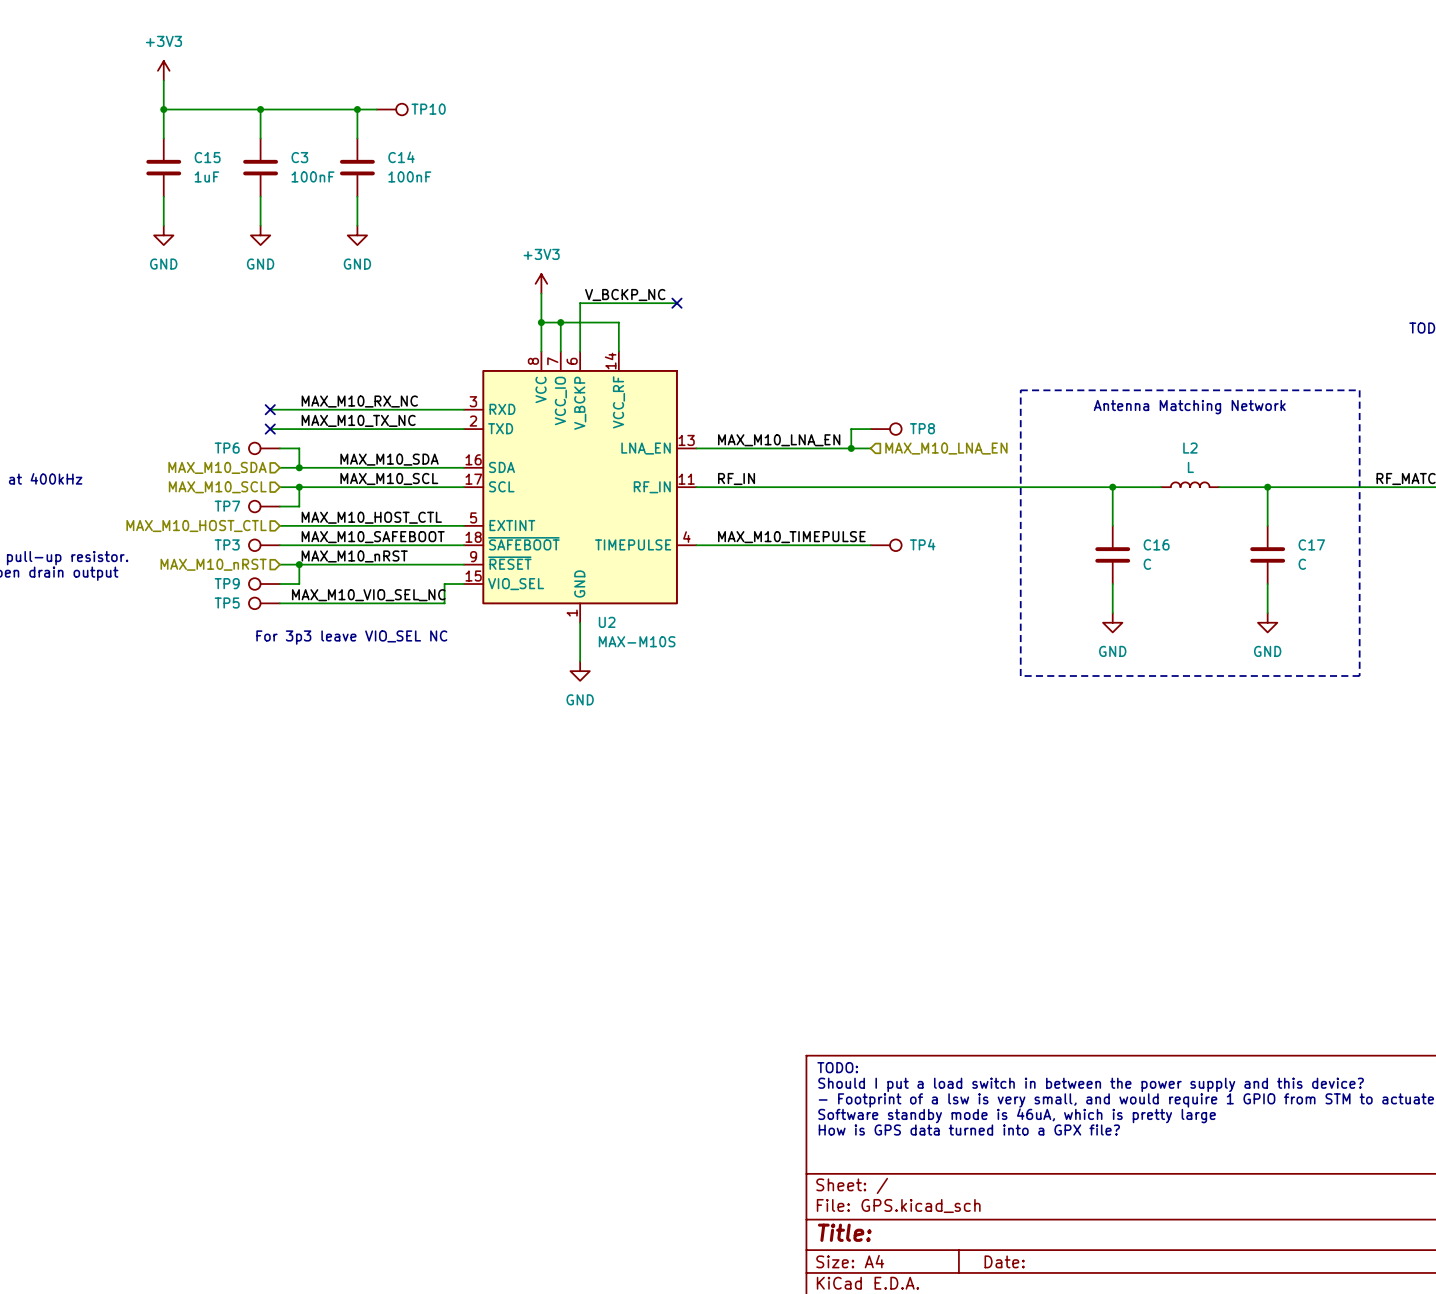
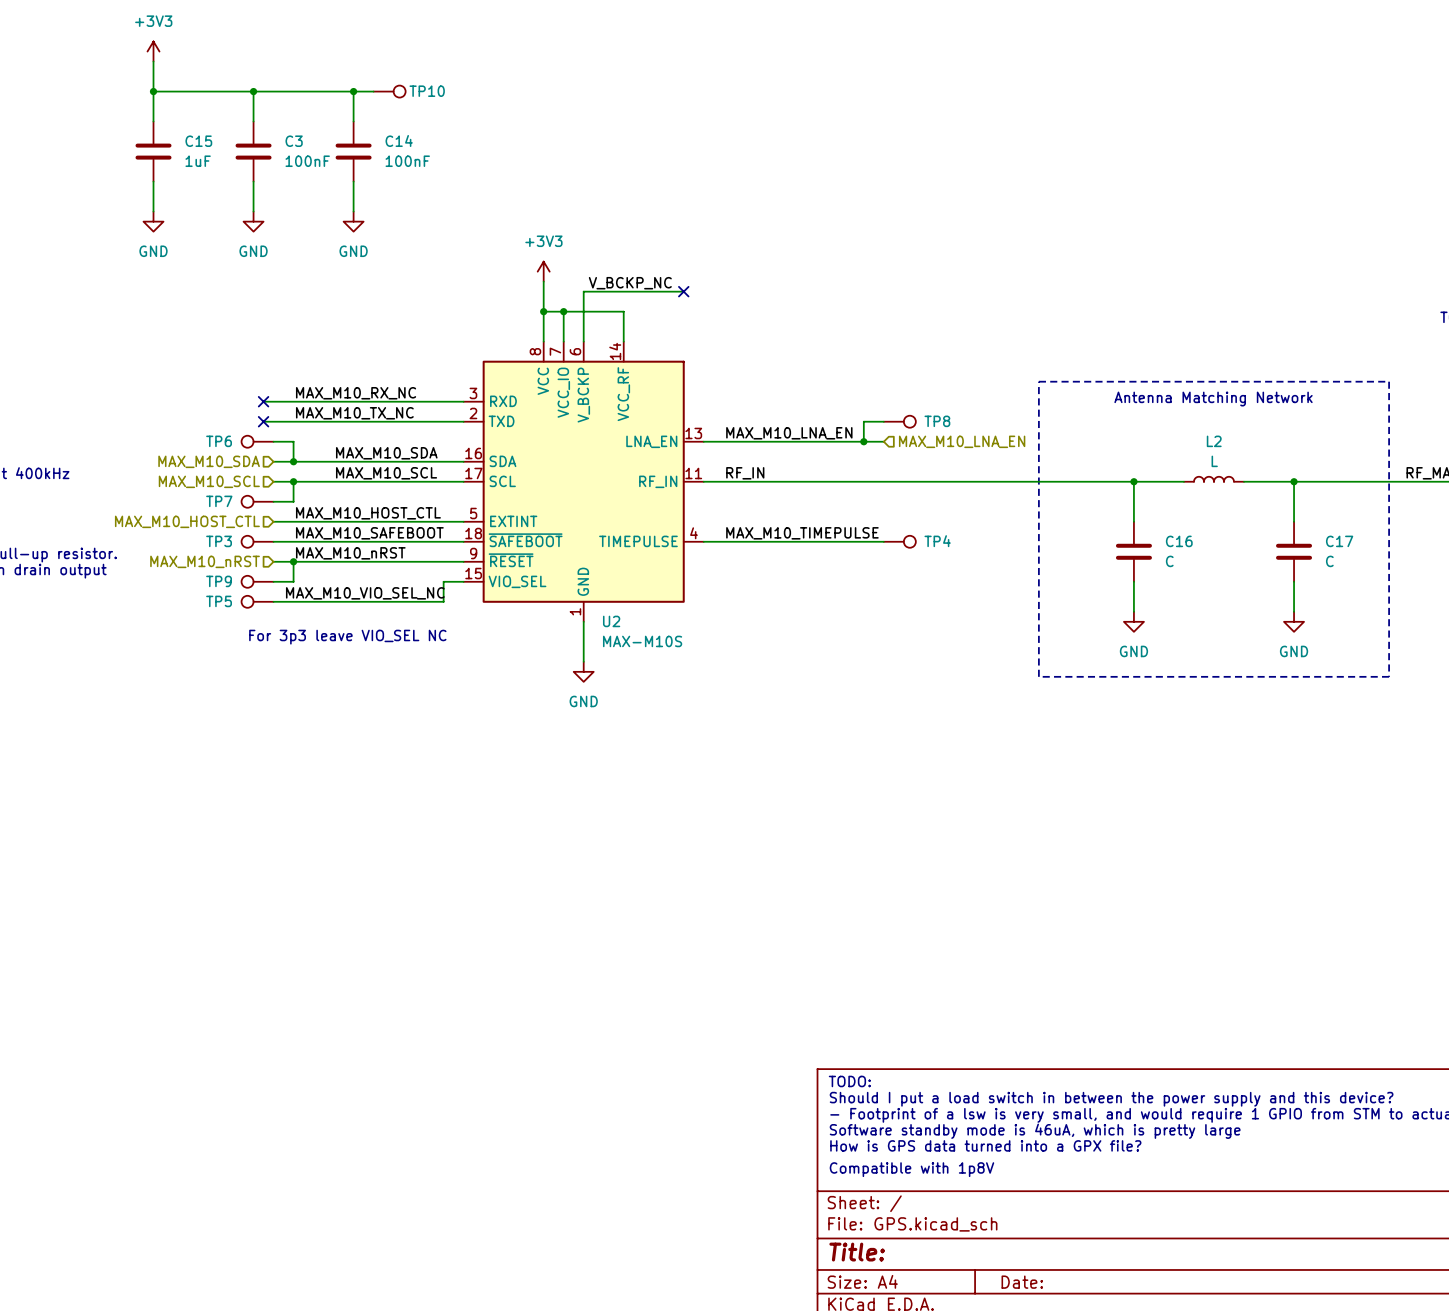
text: none -> Compatible with 1p8V (911, 1169)

